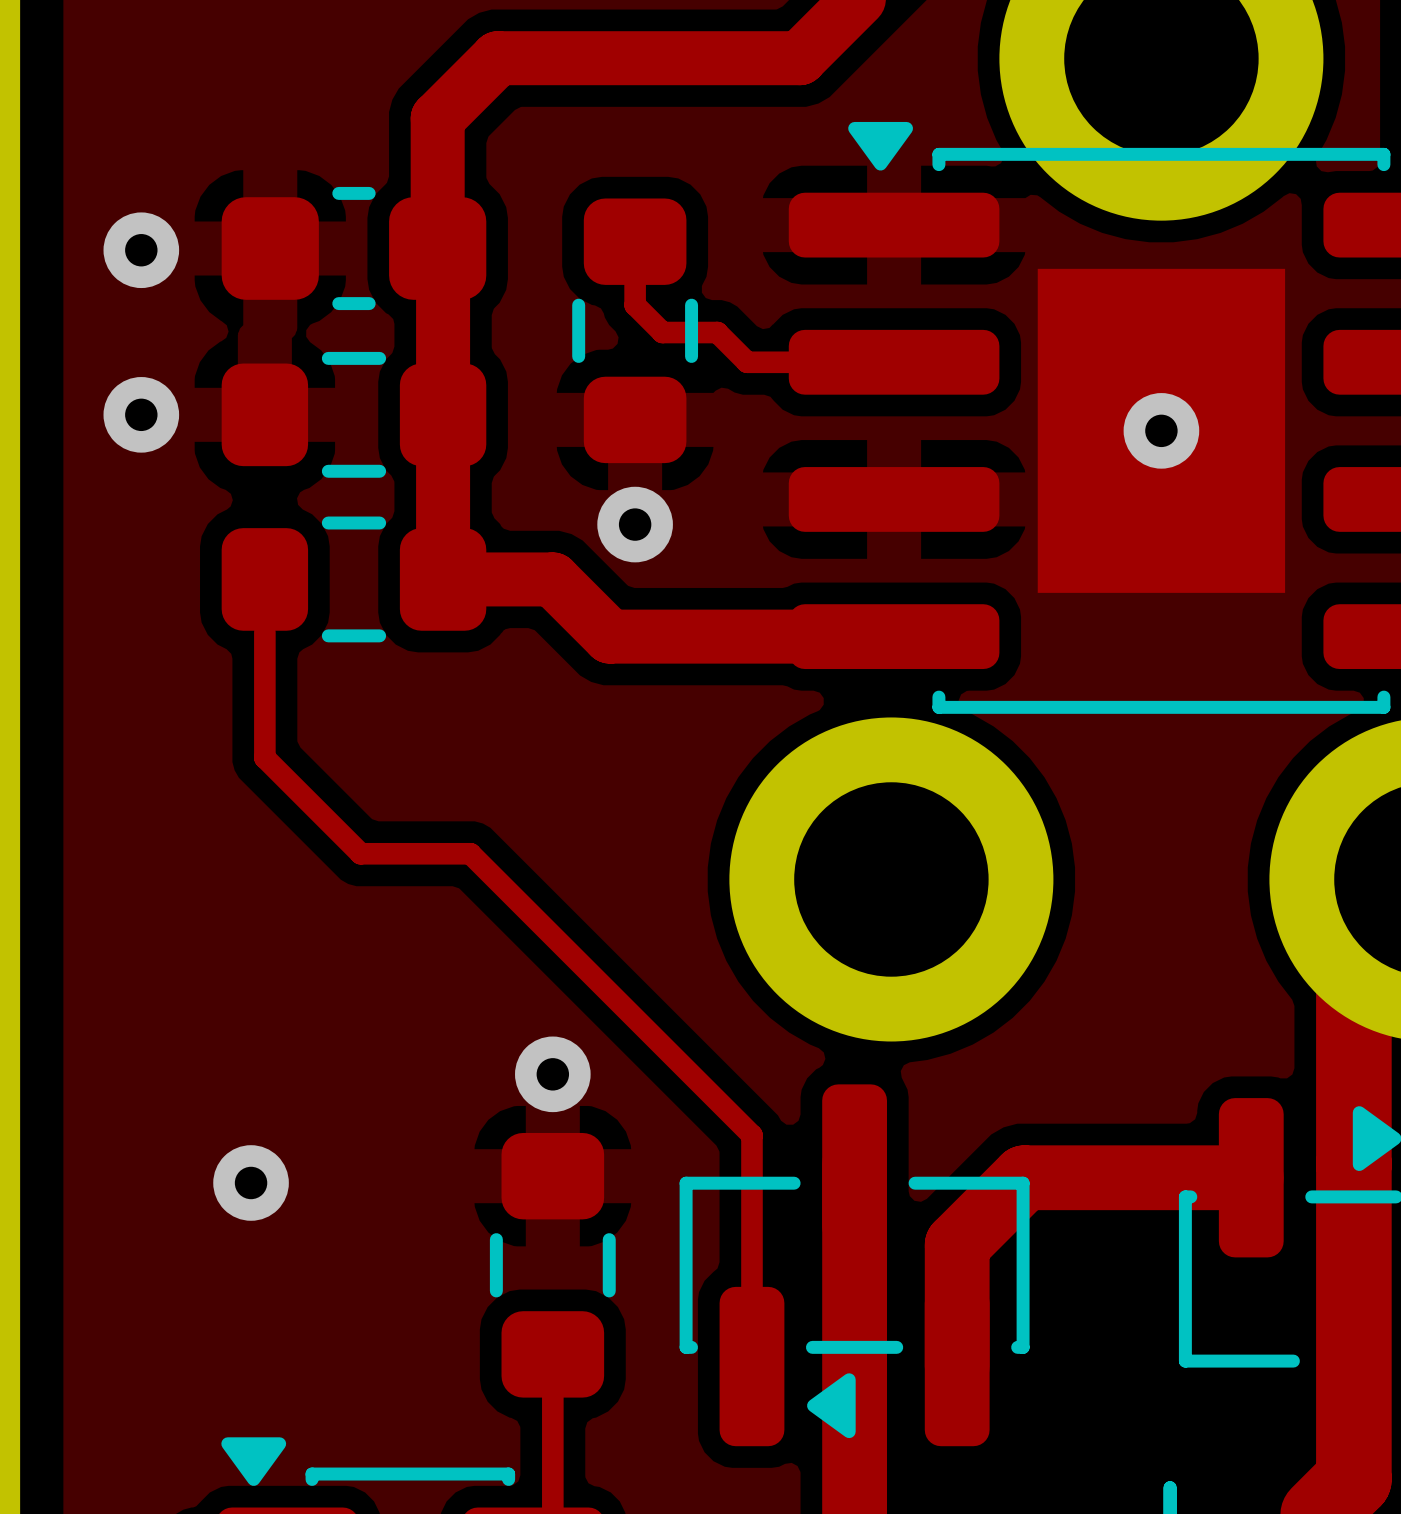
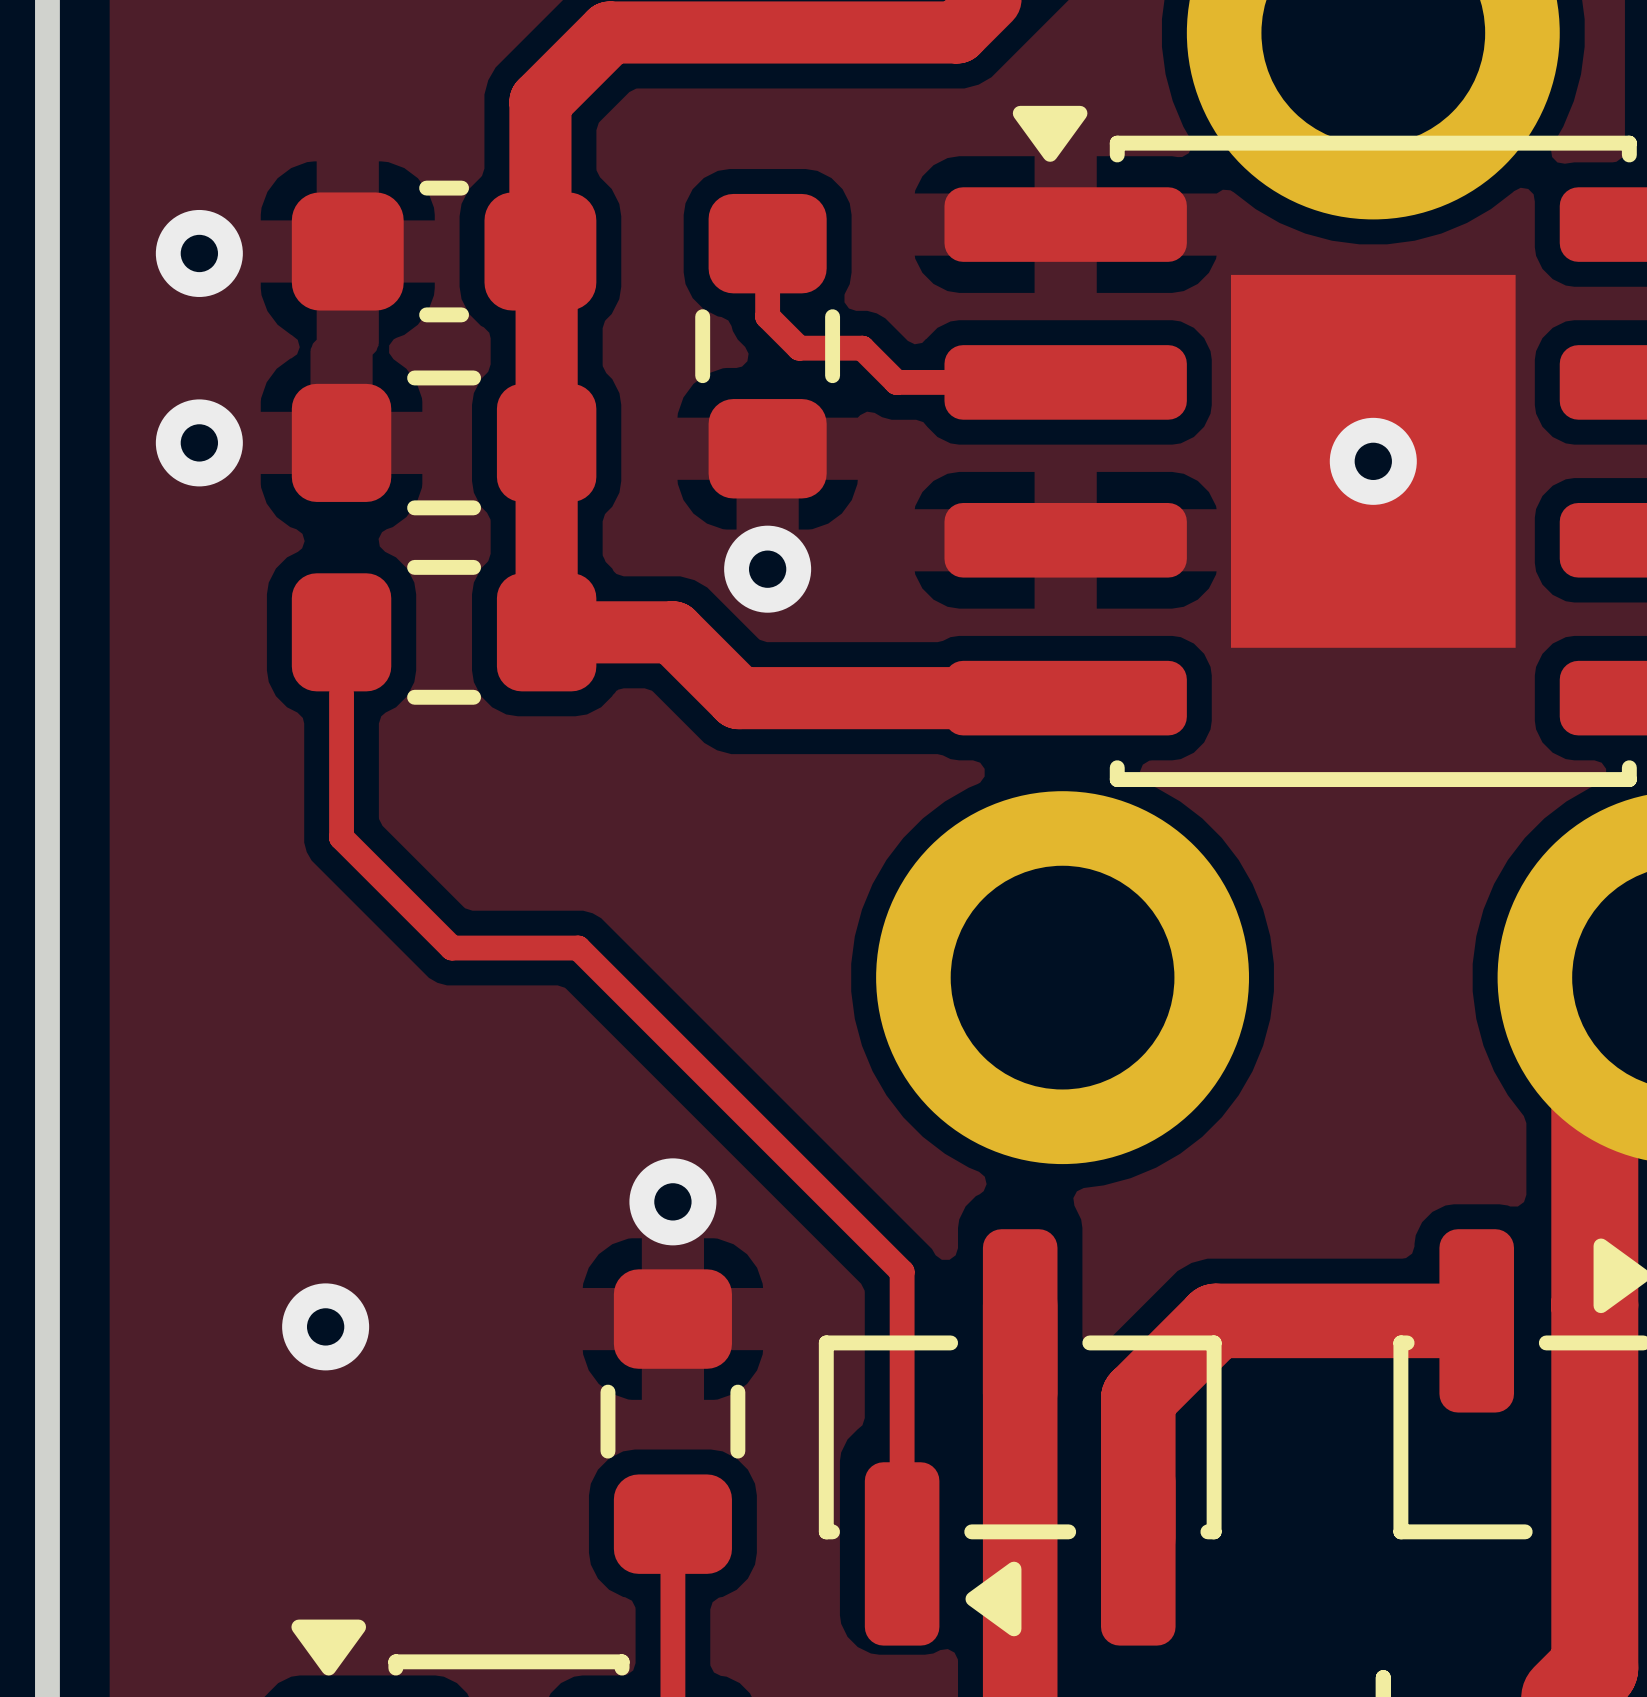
part position: (854, 1265) -> (1020, 1437)

